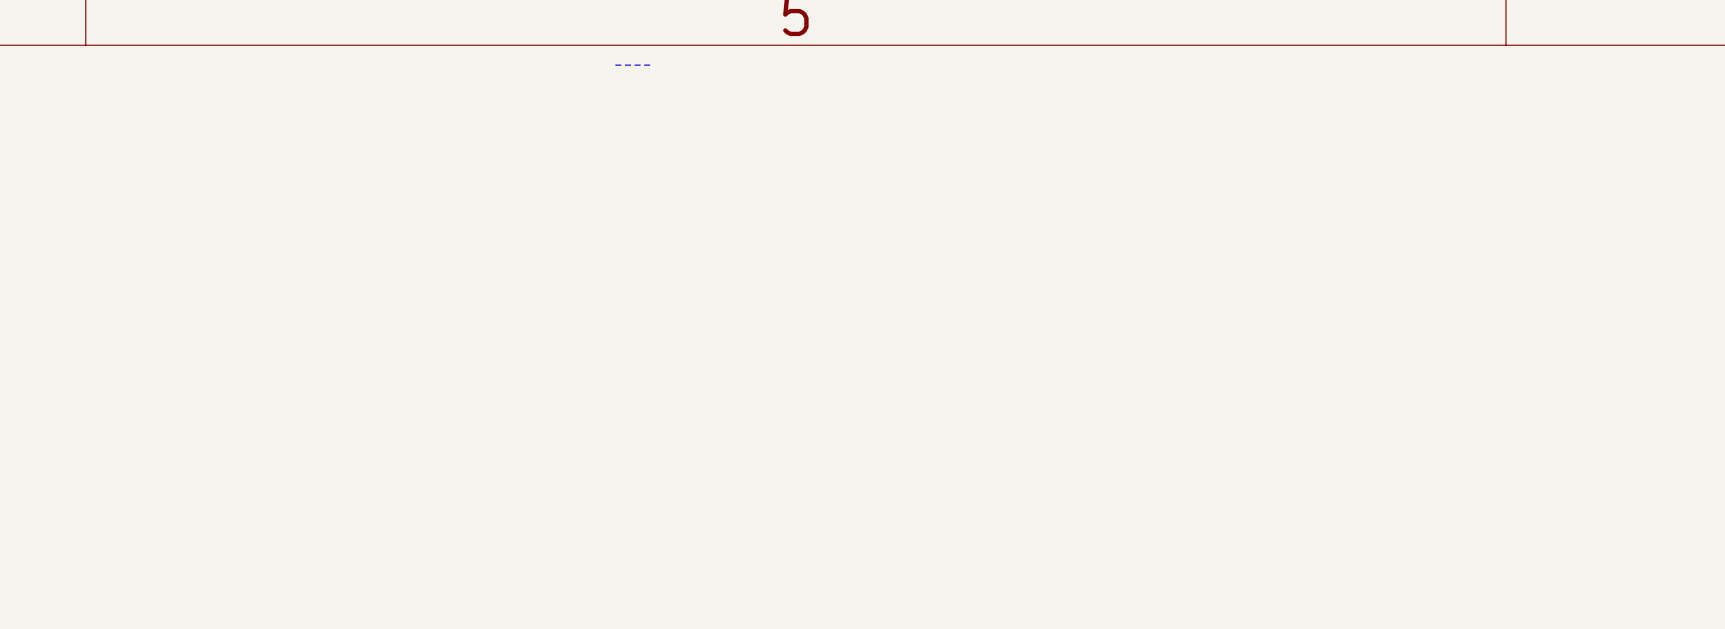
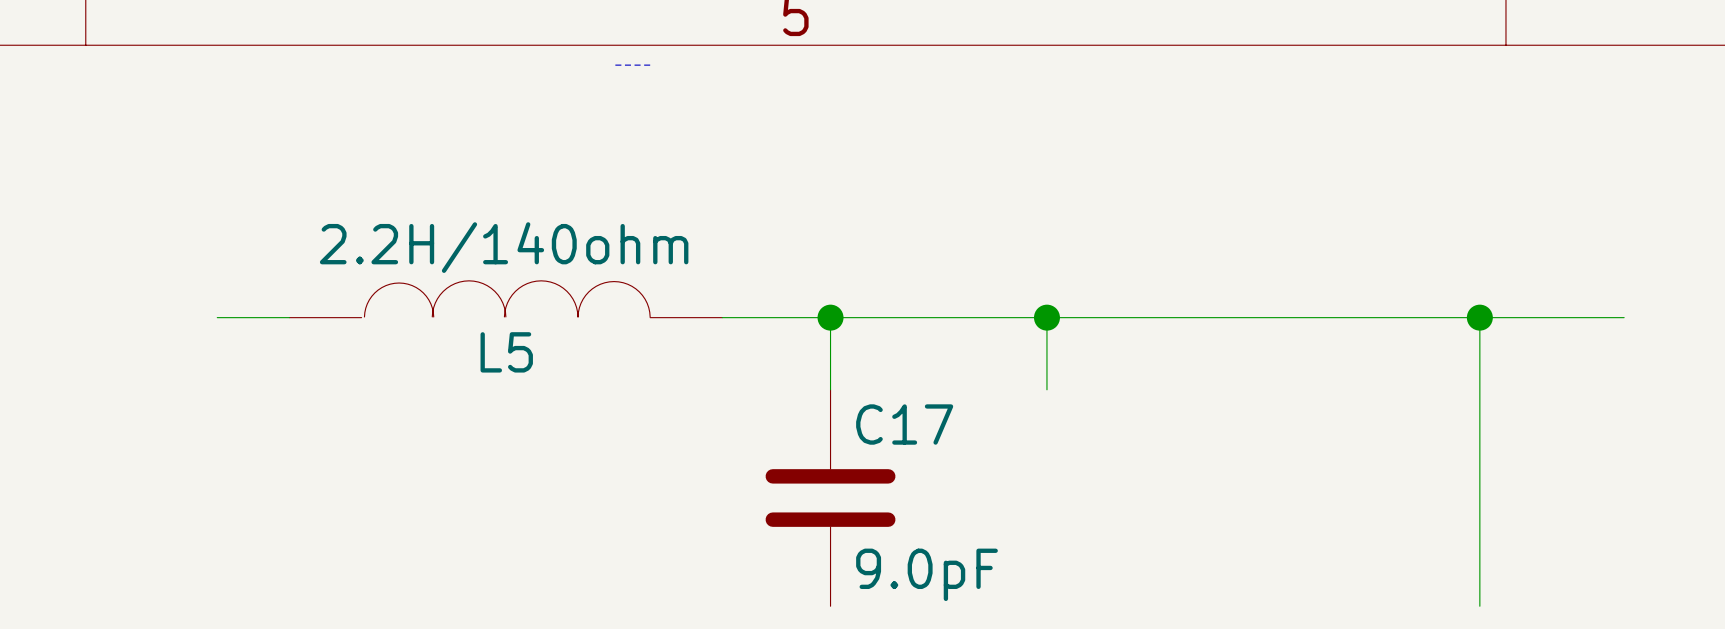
L5: none -> 2.2H/140ohm (505, 299)
wire: none -> (217, 317) (289, 317)
wire: none -> (722, 317) (1624, 317)
wire: none -> (830, 317) (830, 389)
junction: none -> (830, 317)
wire: none -> (1046, 317) (1046, 389)
junction: none -> (1046, 317)
wire: none -> (1479, 317) (1479, 606)
junction: none -> (1479, 317)
C17: none -> 9.0pF (830, 498)

